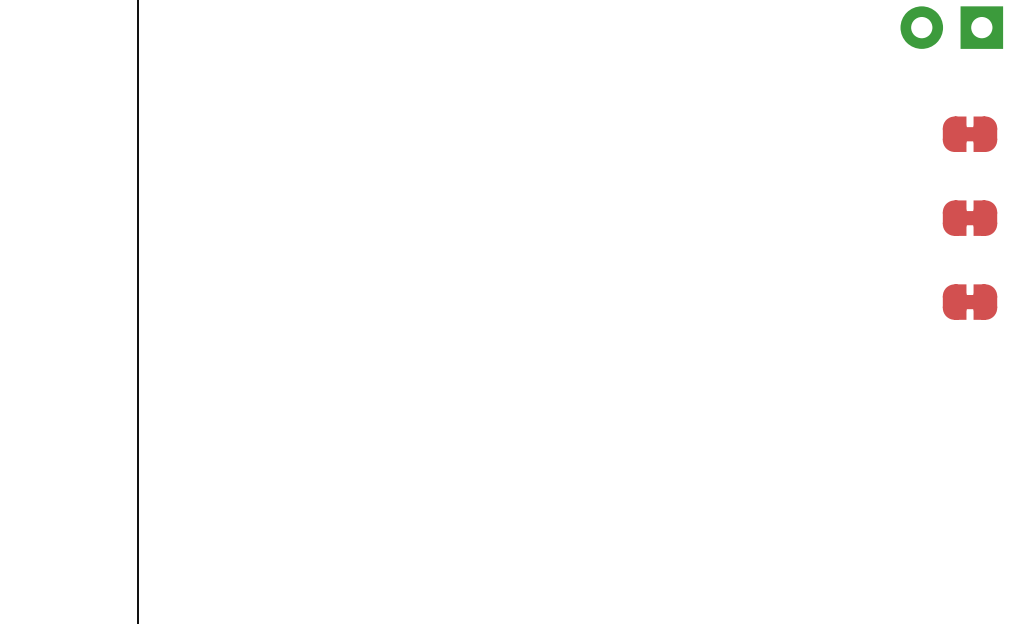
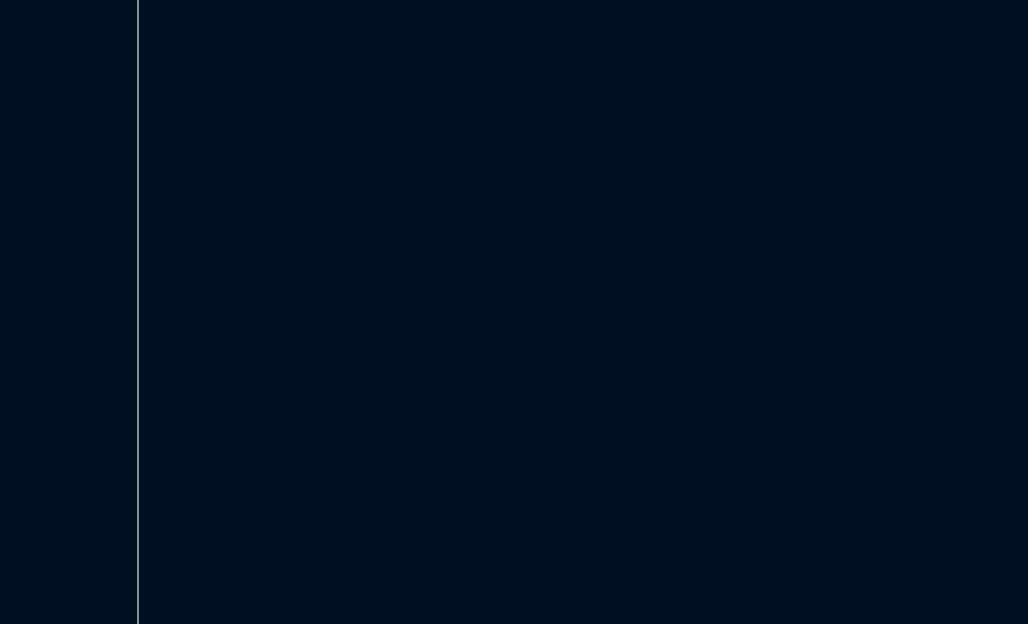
part: (951, 27) -> none
part: (970, 134) -> none
part: (970, 218) -> none
part: (970, 302) -> none

